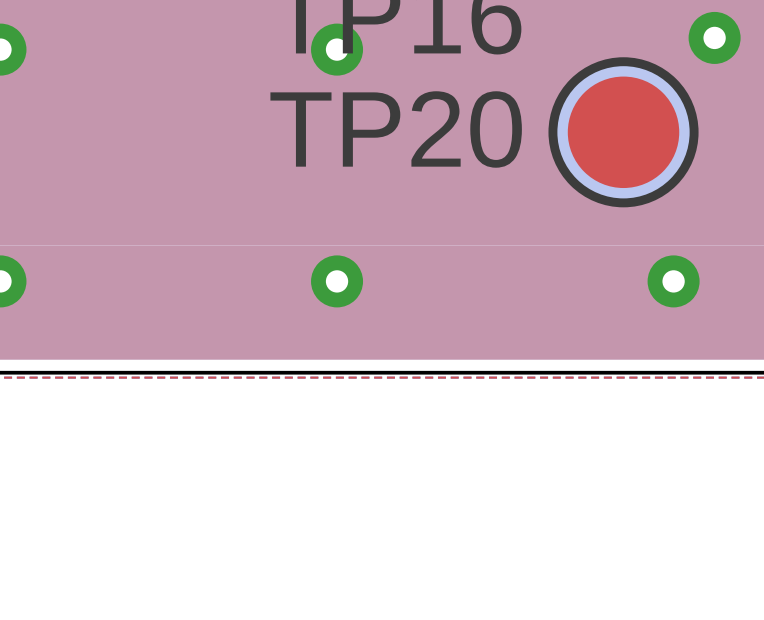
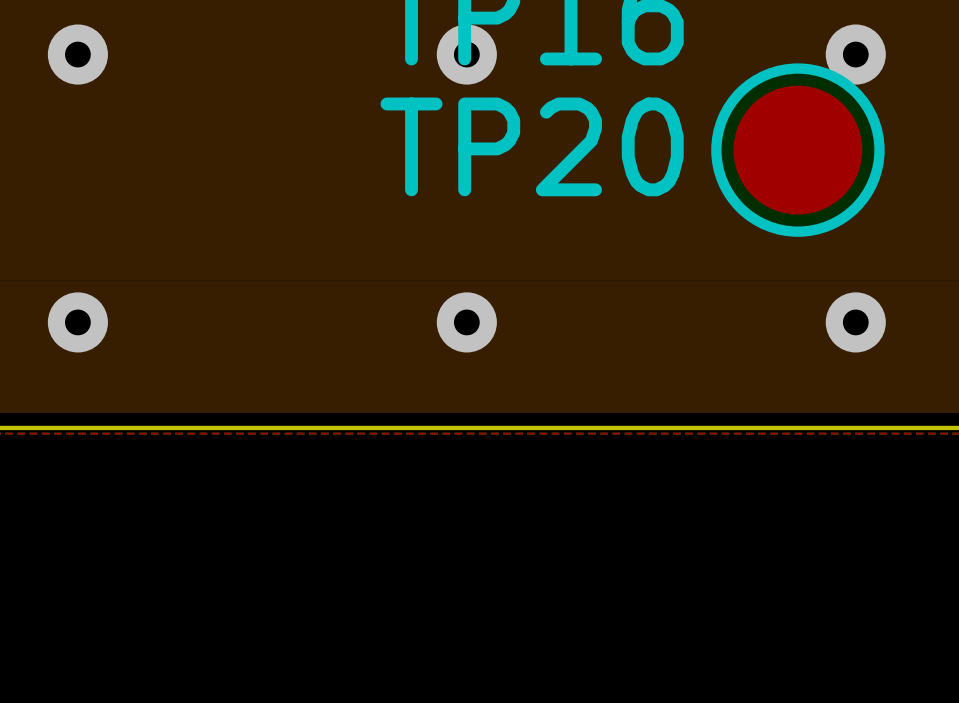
via position: (714, 37) -> (855, 54)

